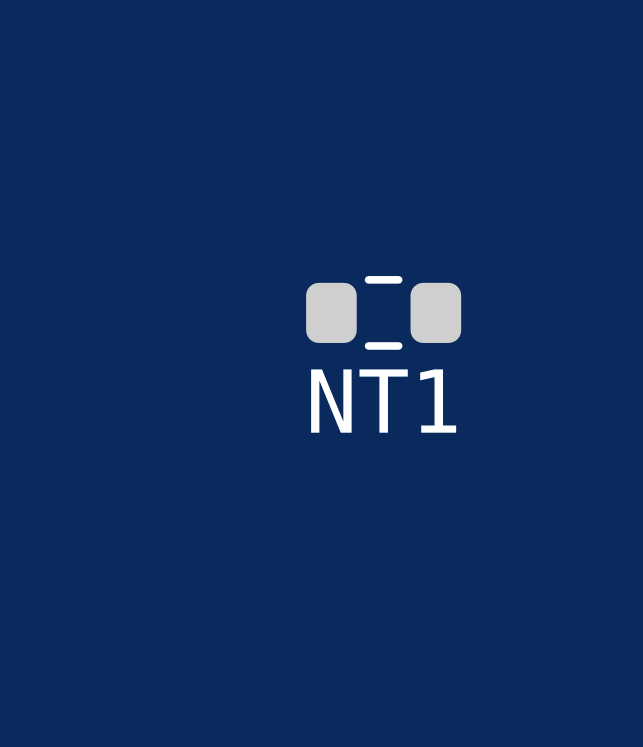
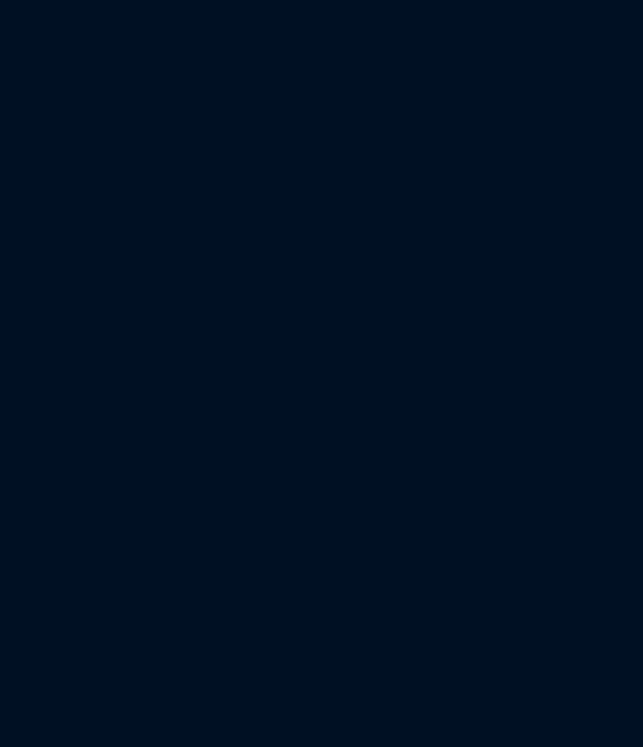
NT1: (383, 312) -> none

